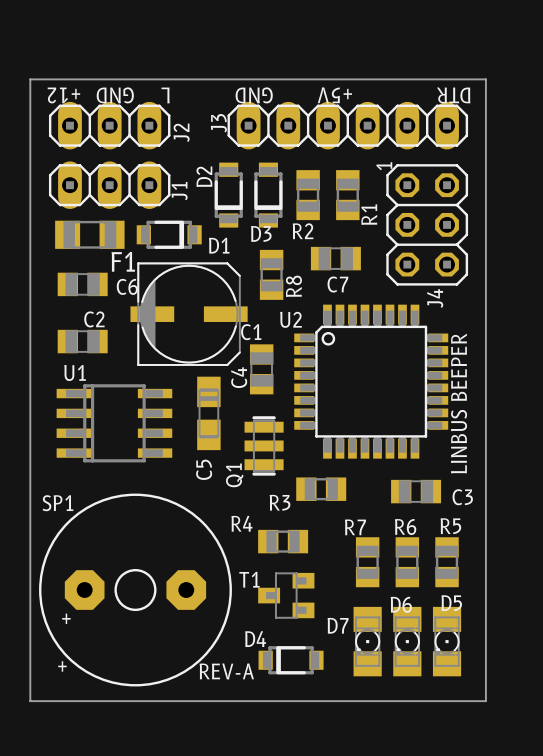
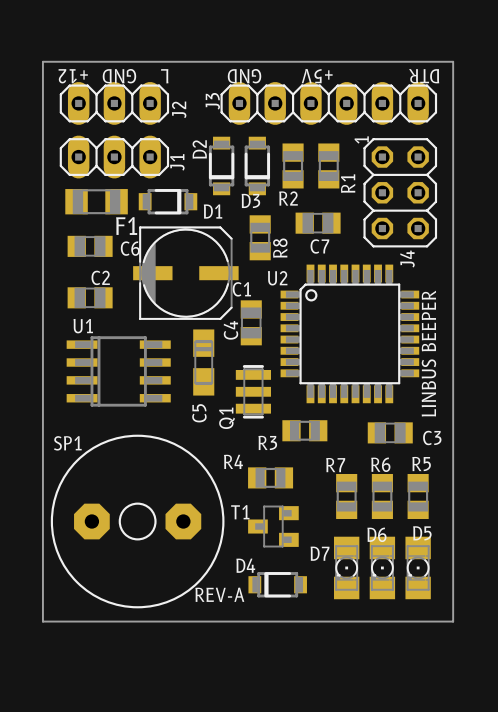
text: + (66, 618) -> none
text: + (62, 666) -> none

